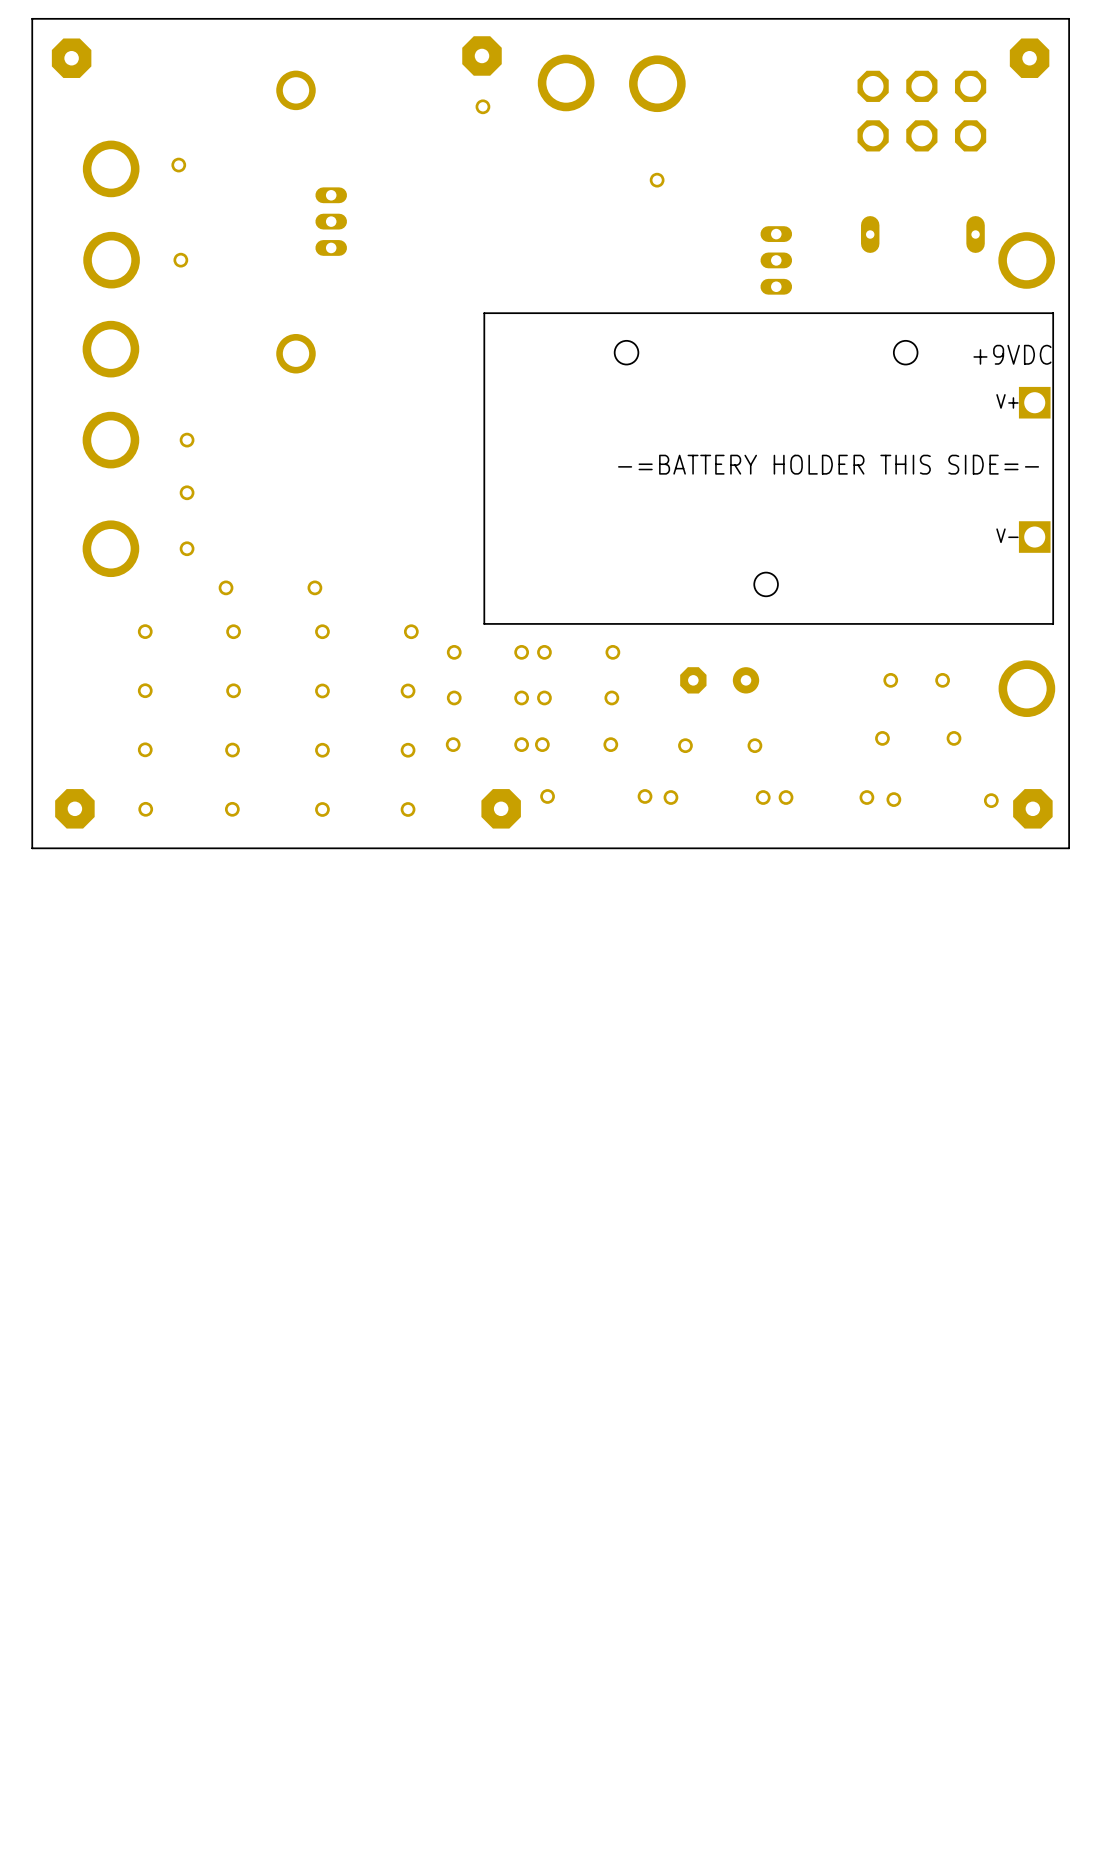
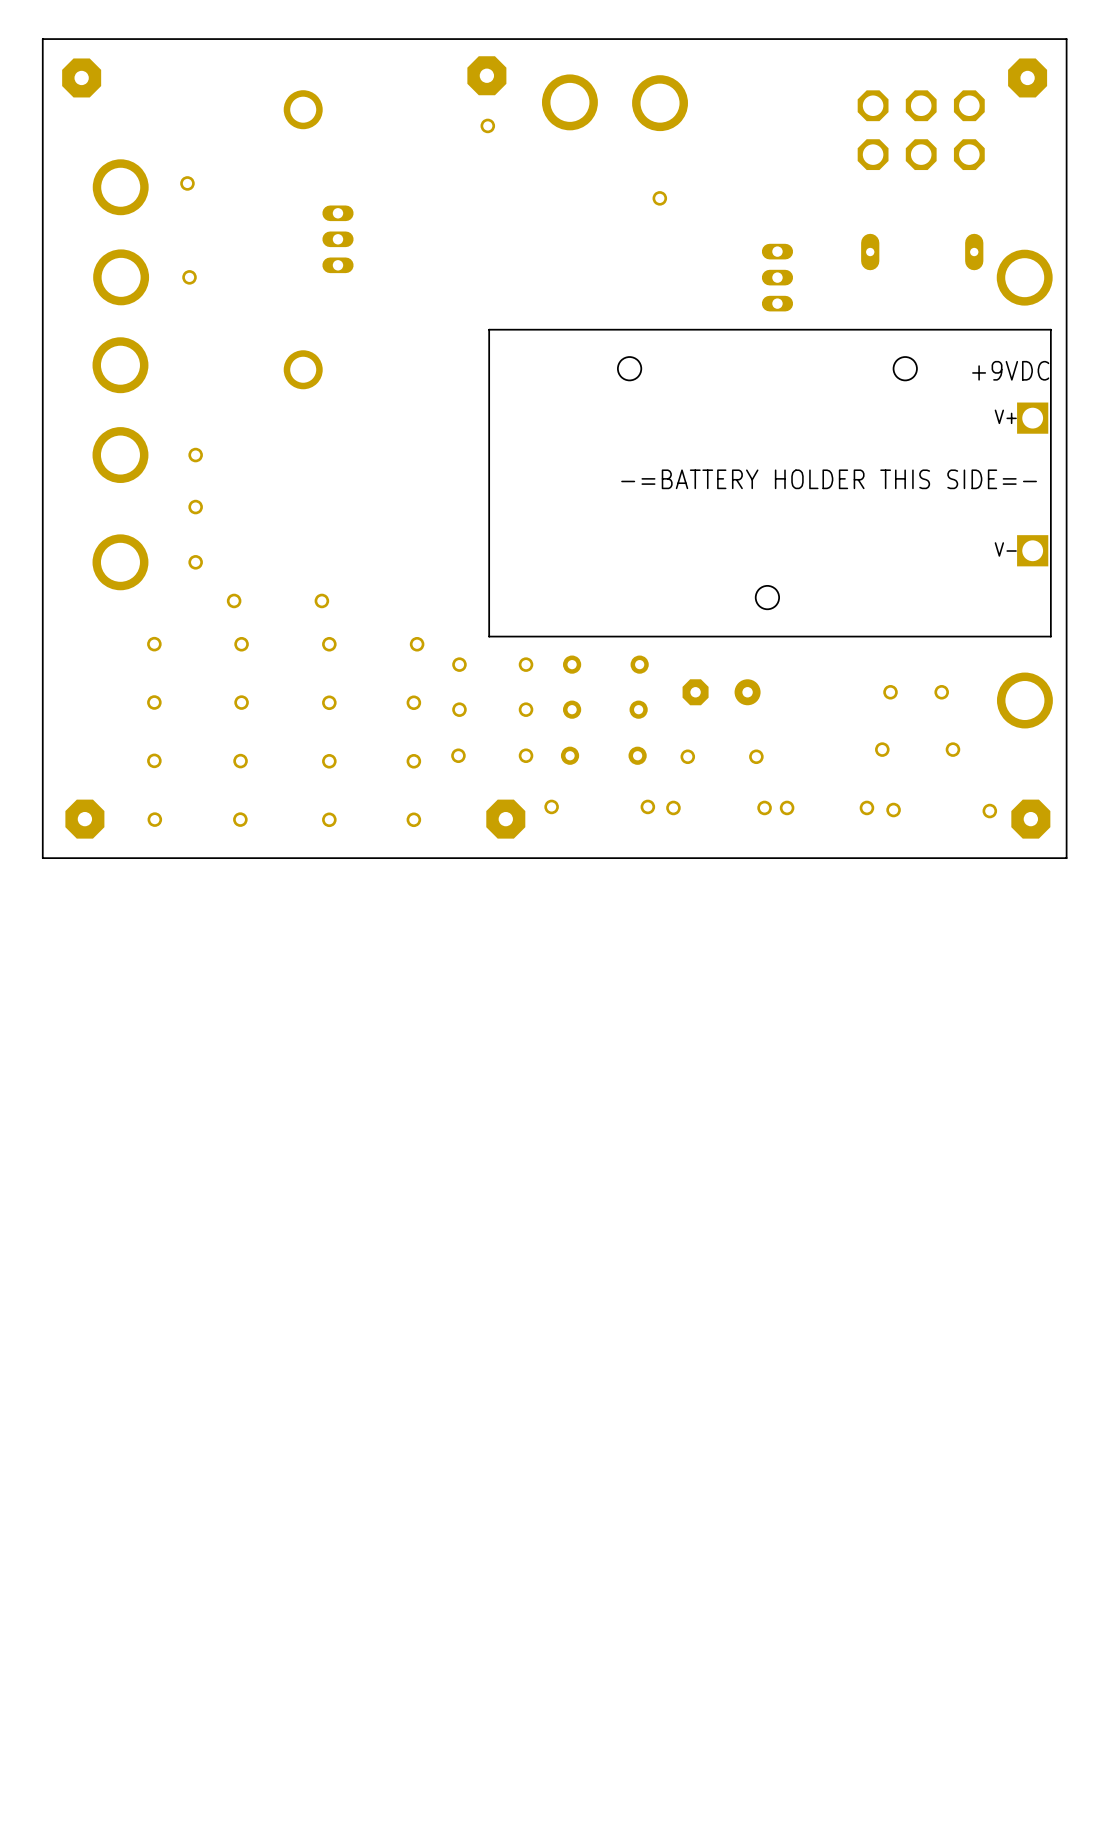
part: (544, 652) -> none
part: none -> (572, 664)
part: (612, 652) -> none
part: none -> (639, 664)
part: (544, 697) -> none
part: none -> (572, 709)
part: (611, 697) -> none
part: none -> (638, 709)
part: (542, 744) -> none
part: none -> (570, 755)
part: (610, 744) -> none
part: none -> (637, 755)

